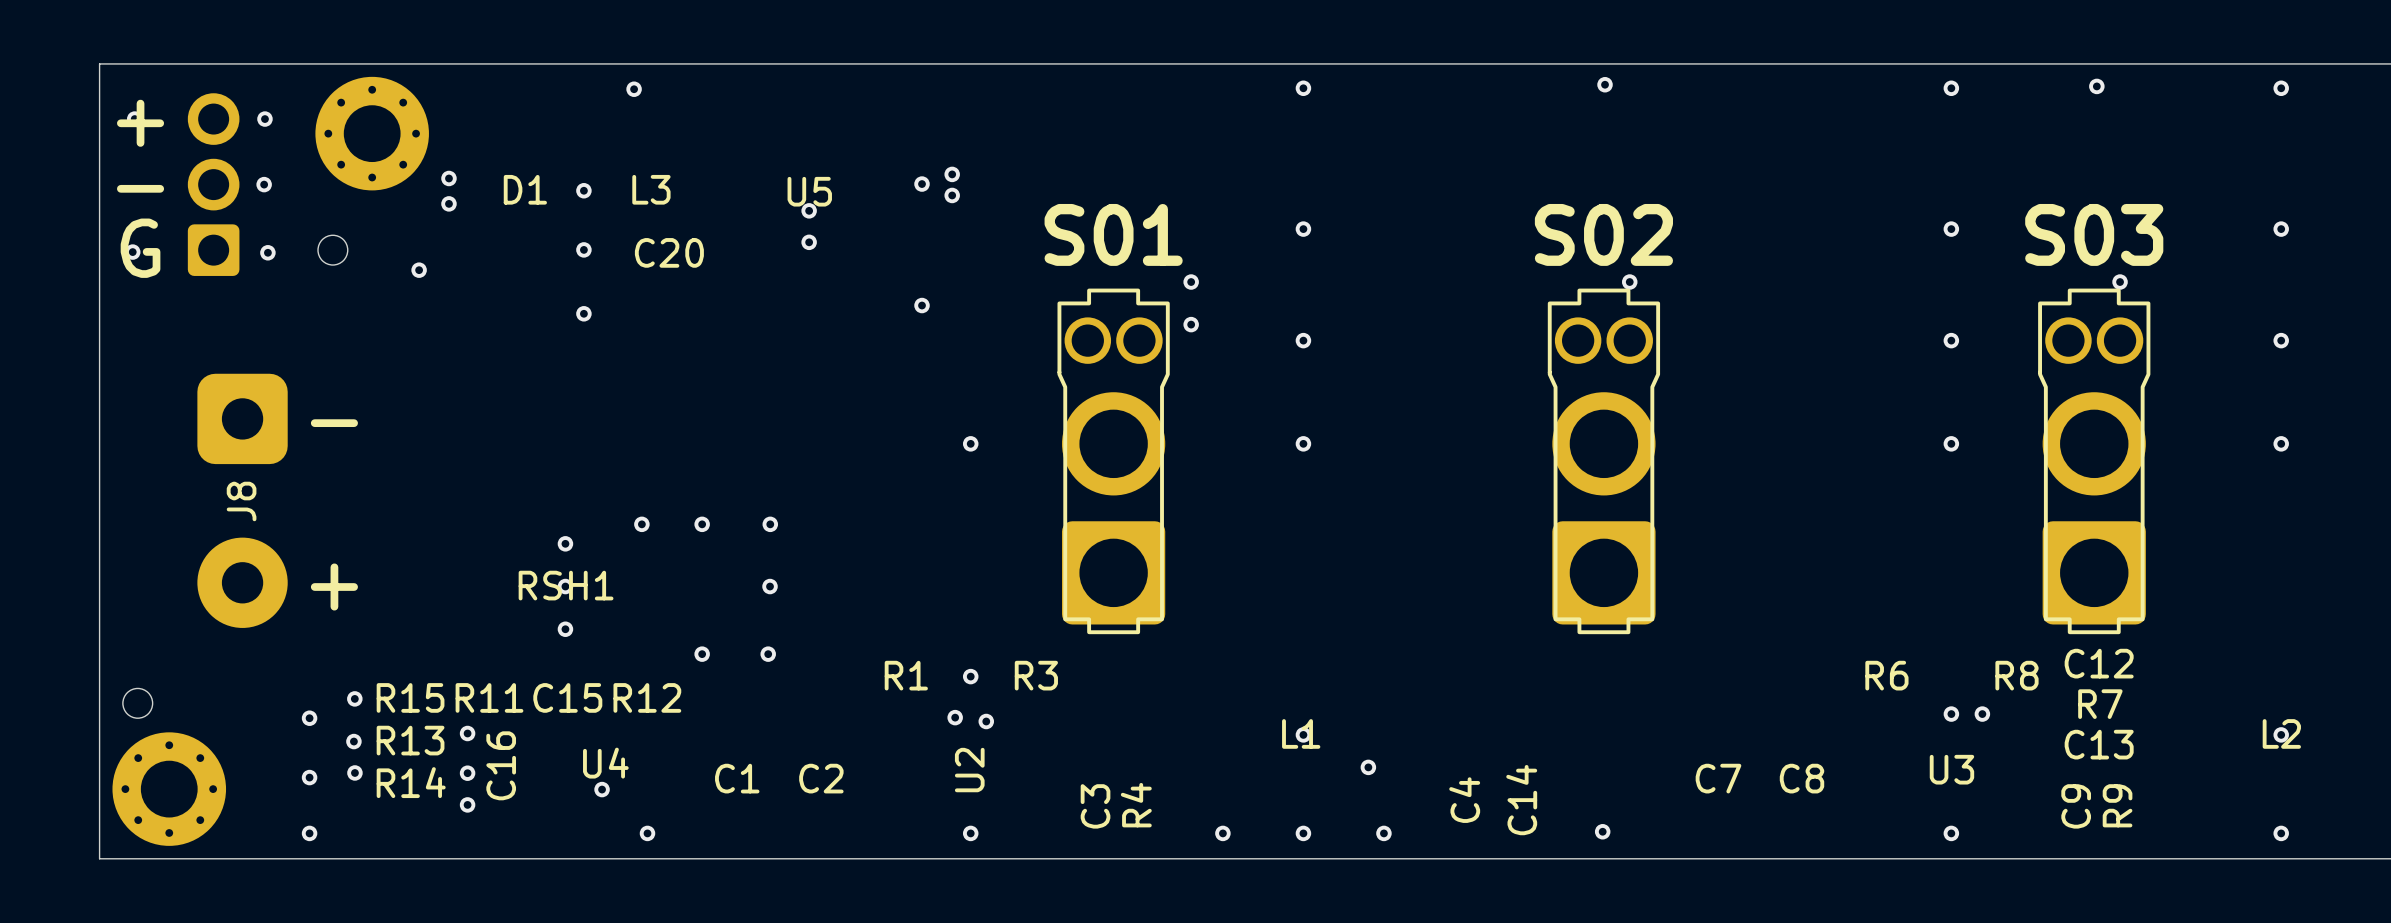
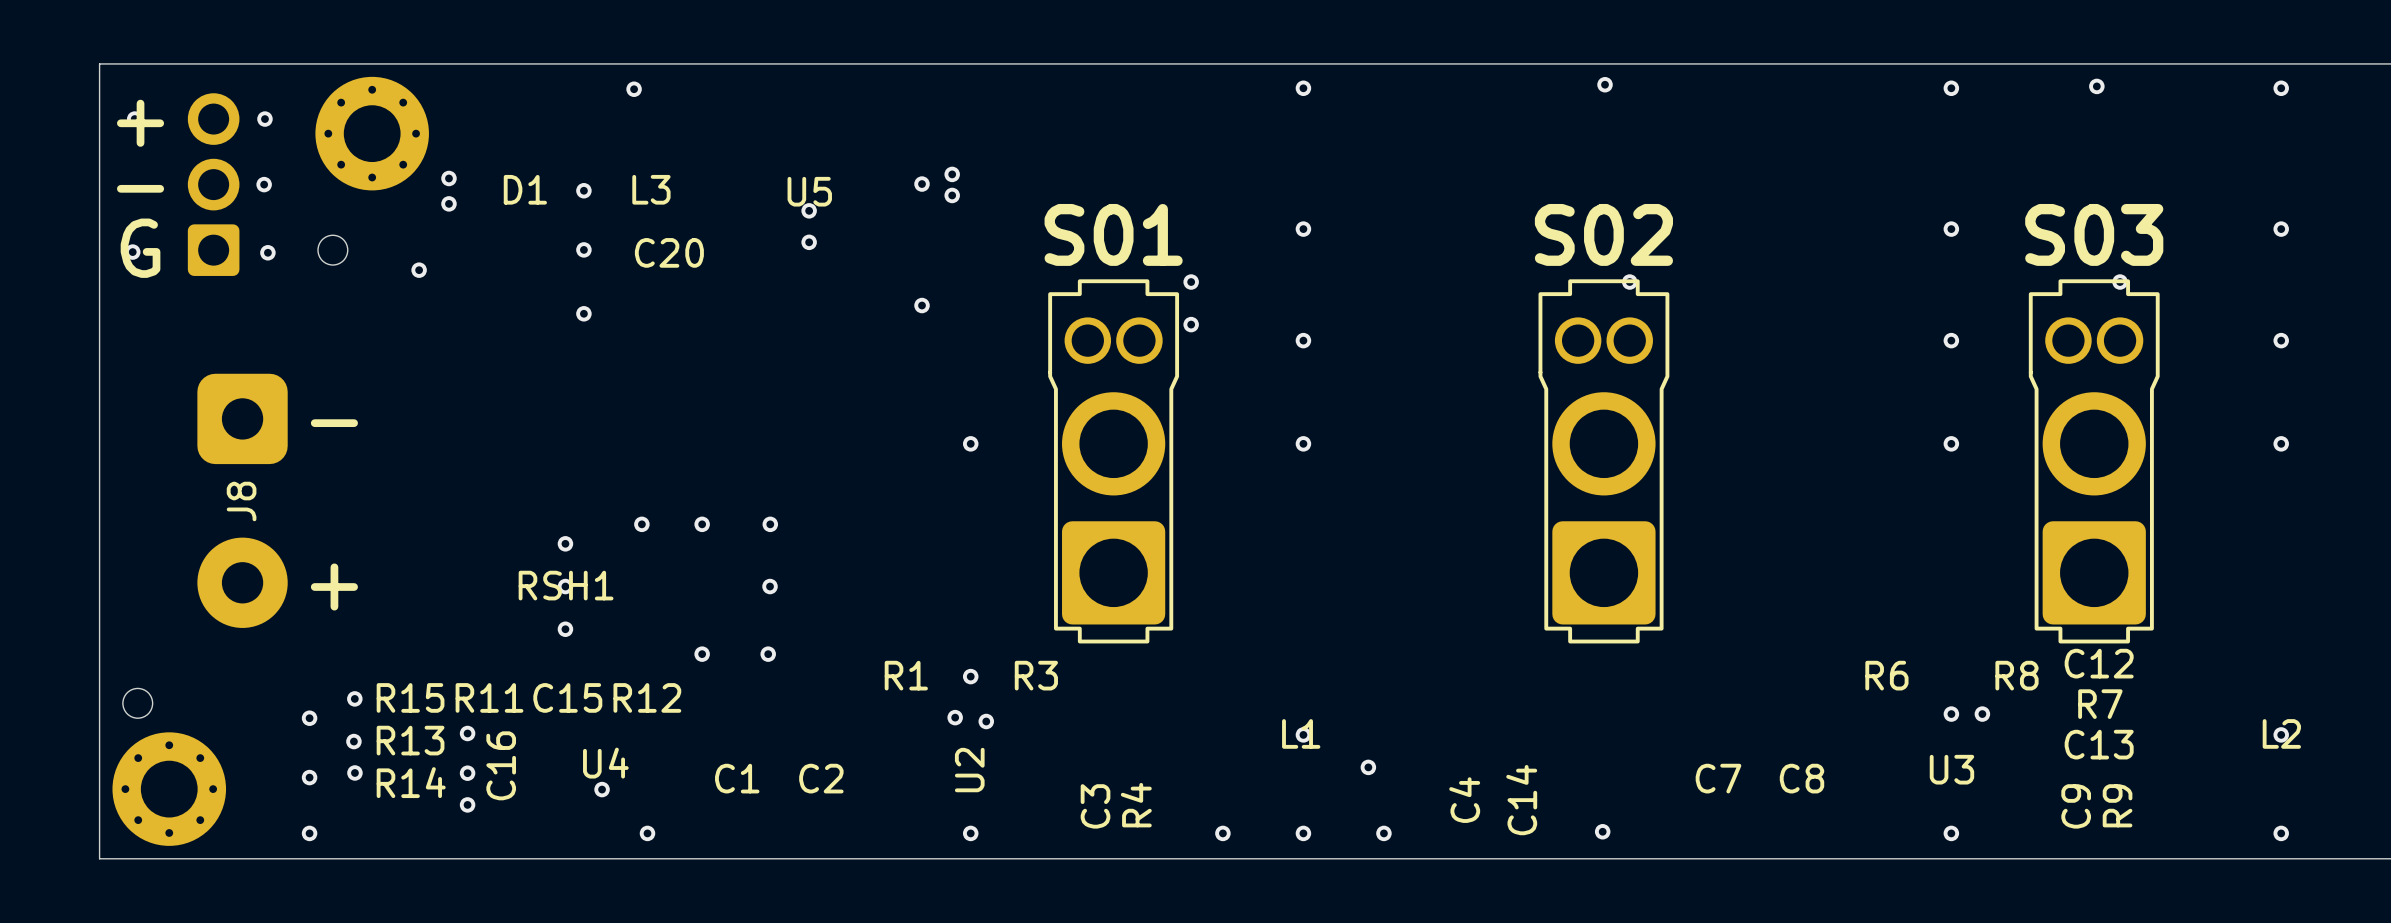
part footprint: [1057, 288, 1170, 635] -> [1048, 279, 1180, 644]
part footprint: [1547, 288, 1661, 635] -> [1538, 279, 1670, 644]
part footprint: [2038, 288, 2151, 635] -> [2028, 279, 2160, 644]

